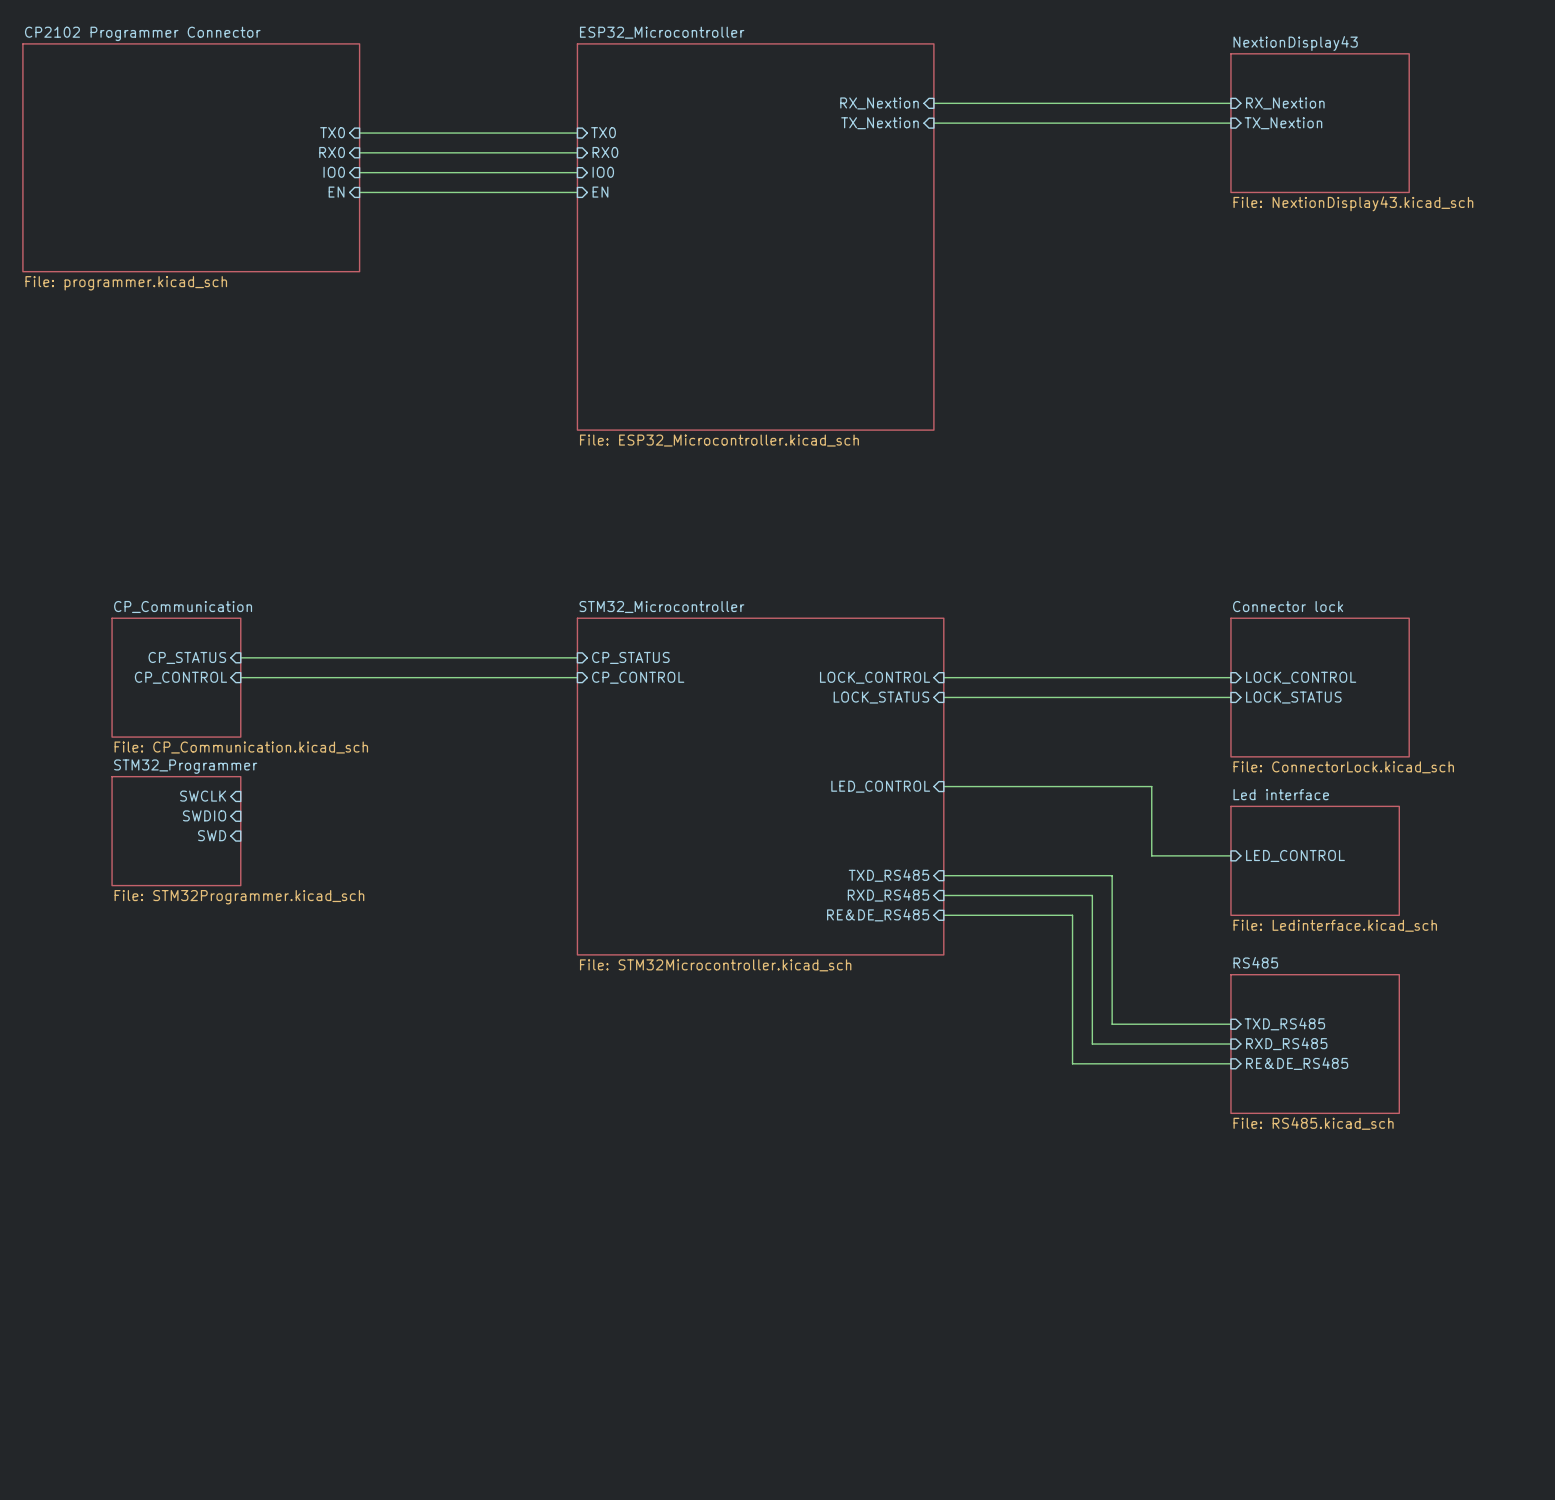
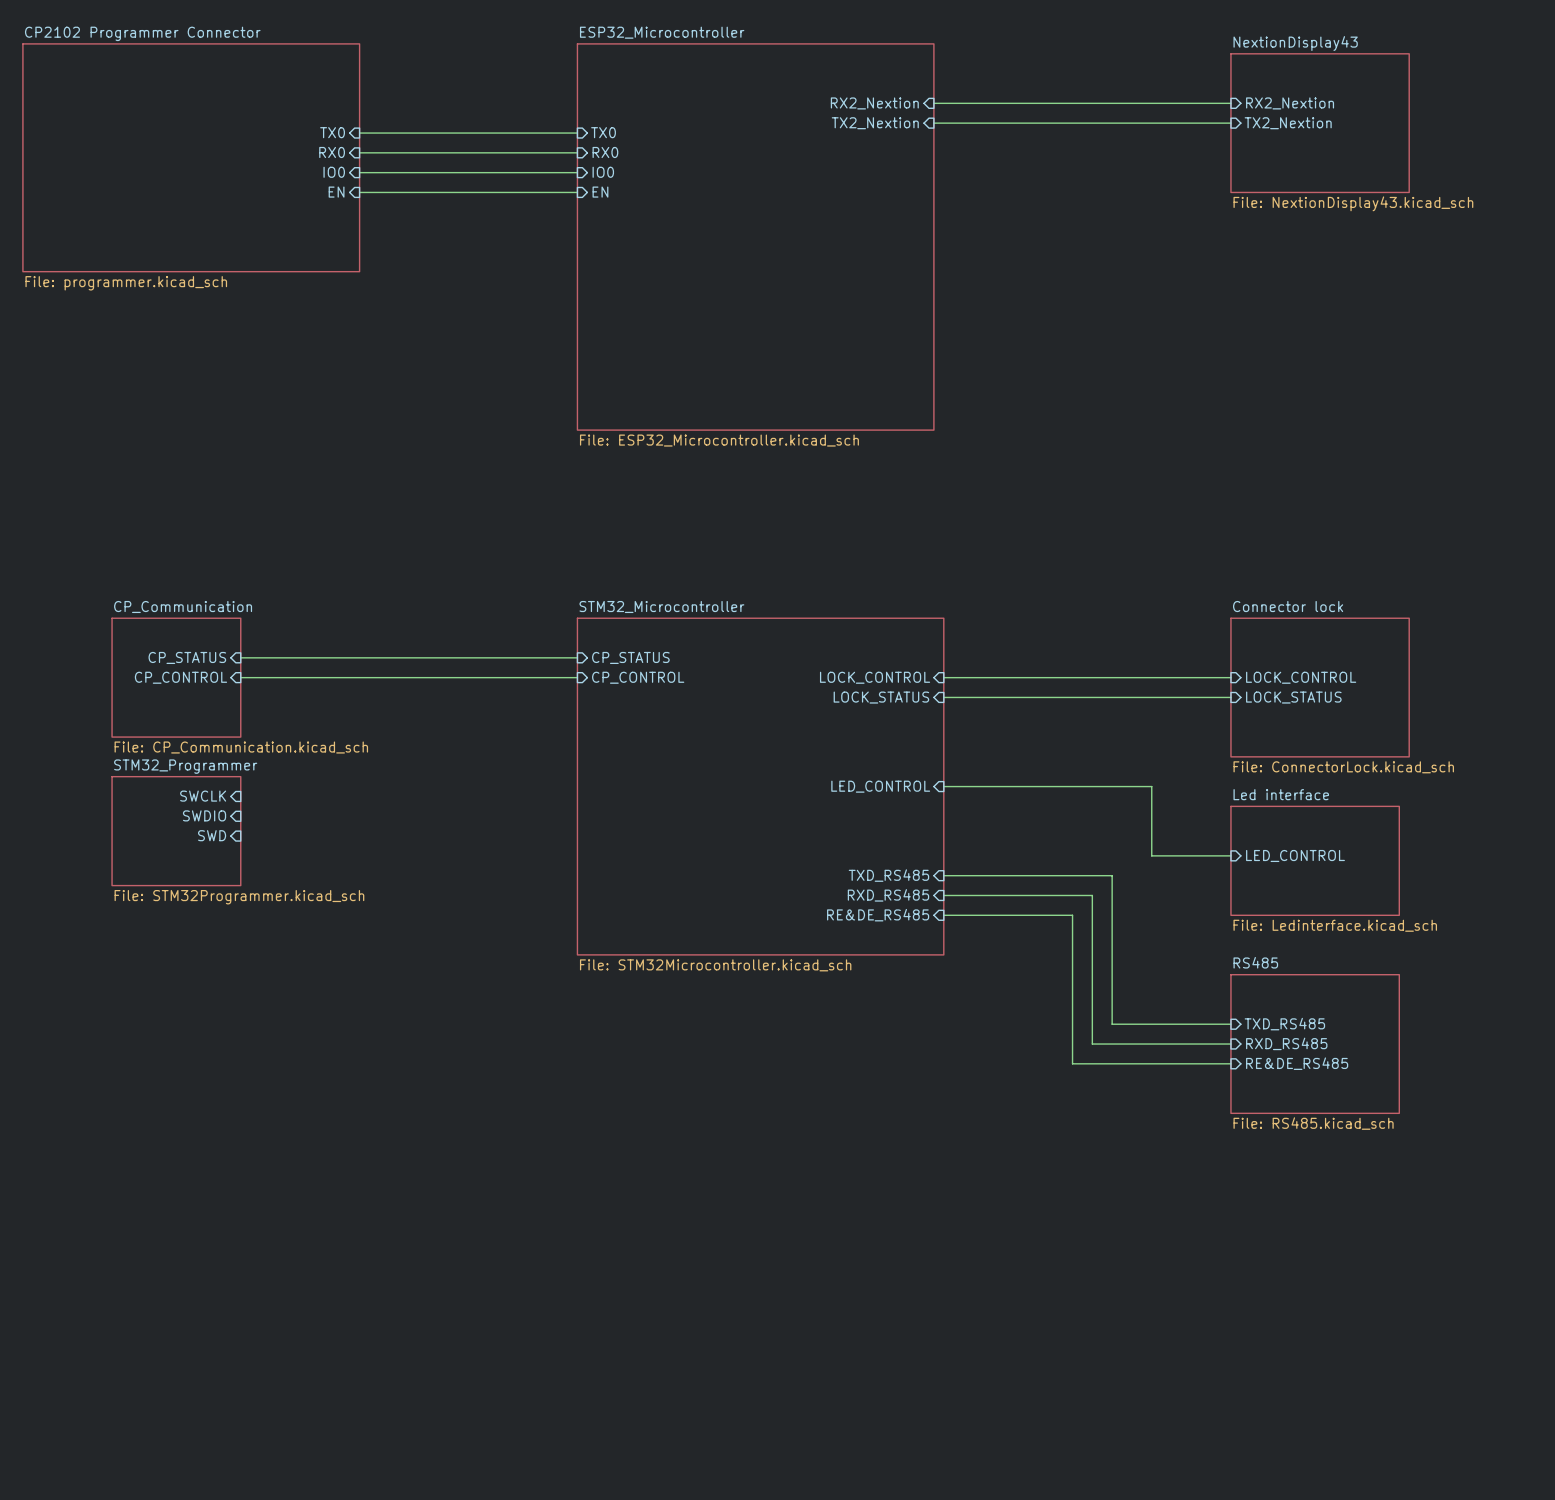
sheet pin: RX_Nextion (879, 103) -> RX2_Nextion (874, 103)
sheet pin: RX_Nextion (1285, 103) -> RX2_Nextion (1290, 103)
sheet pin: TX_Nextion (880, 123) -> TX2_Nextion (875, 123)
sheet pin: TX_Nextion (1283, 123) -> TX2_Nextion (1288, 123)

